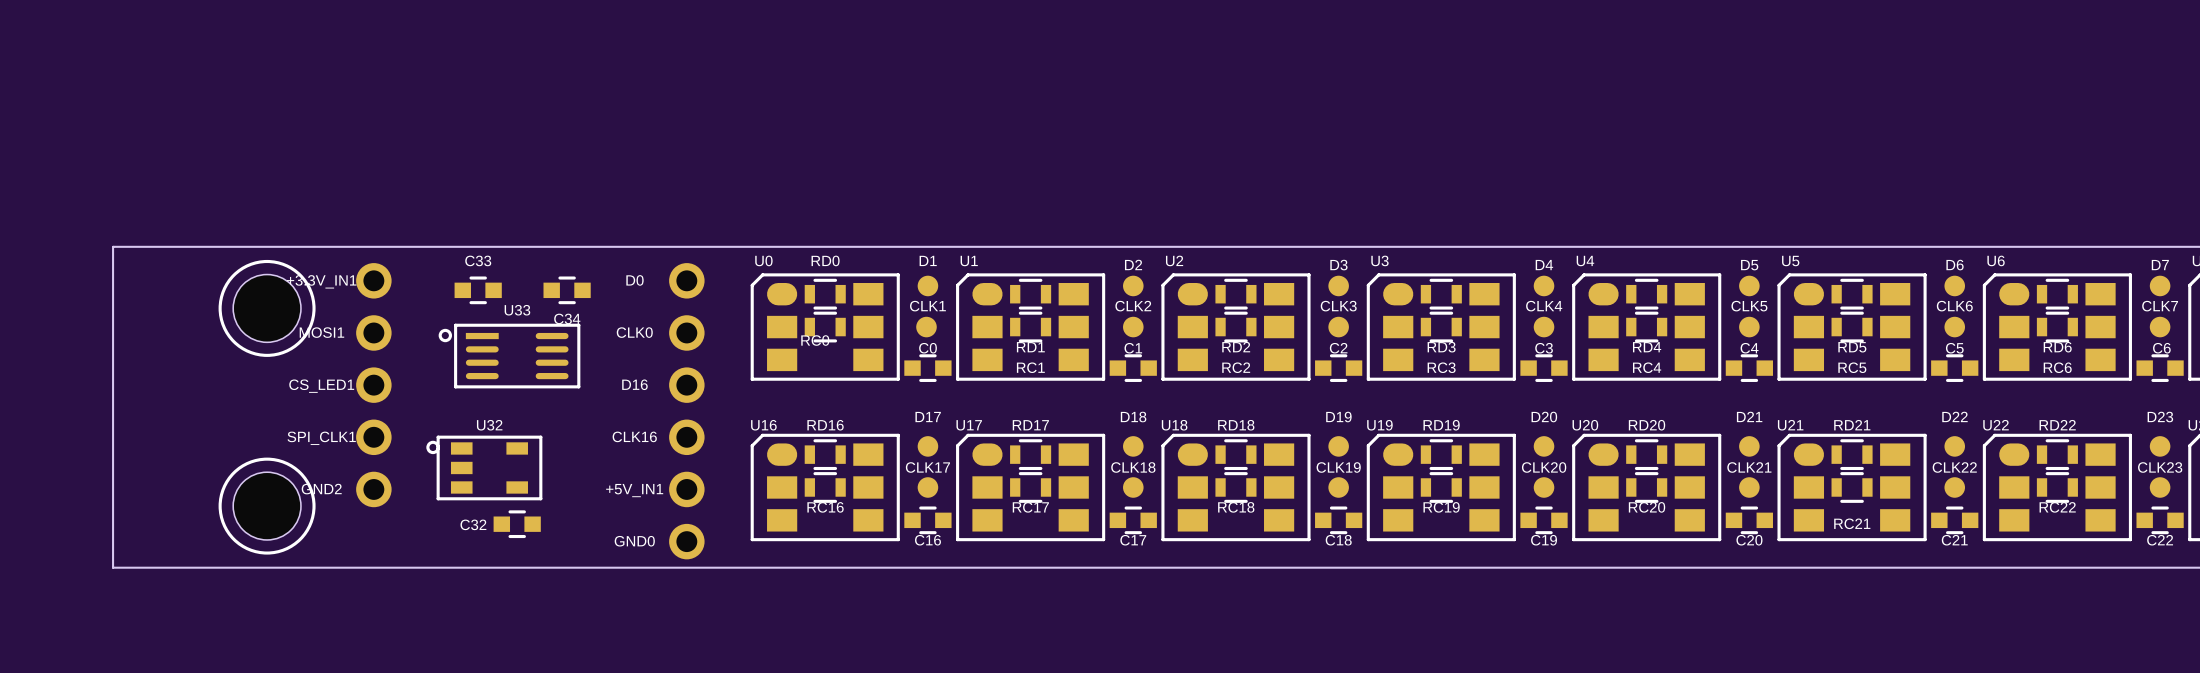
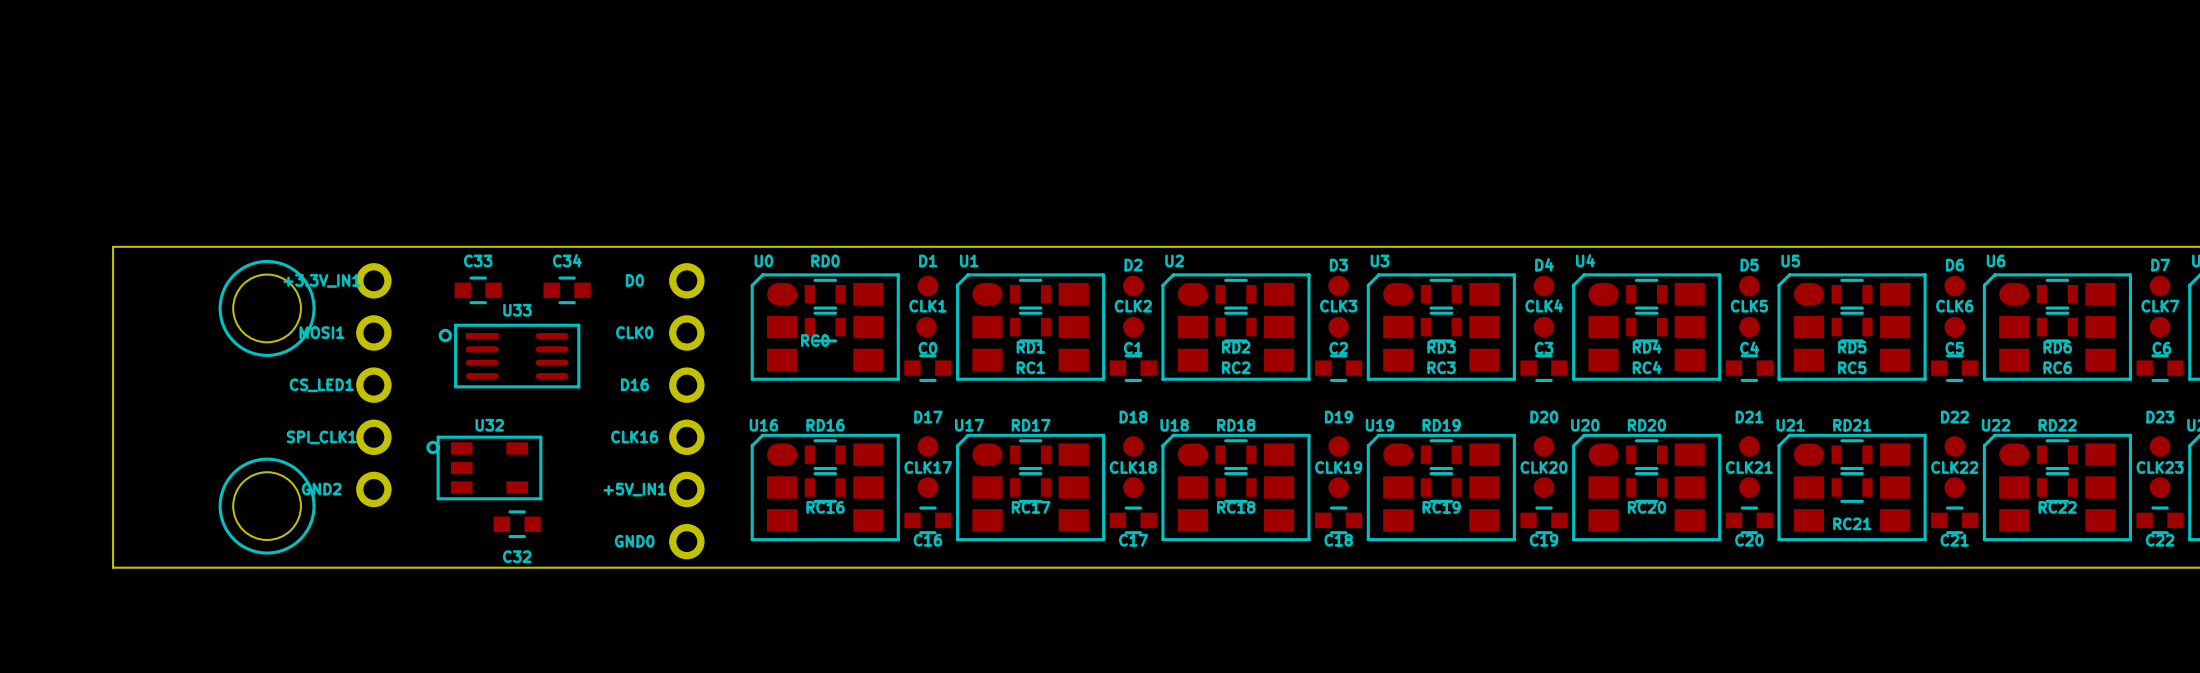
C34 name position: C34 (567, 318) -> C34 (567, 260)
C32 name position: C32 (473, 524) -> C32 (517, 556)

